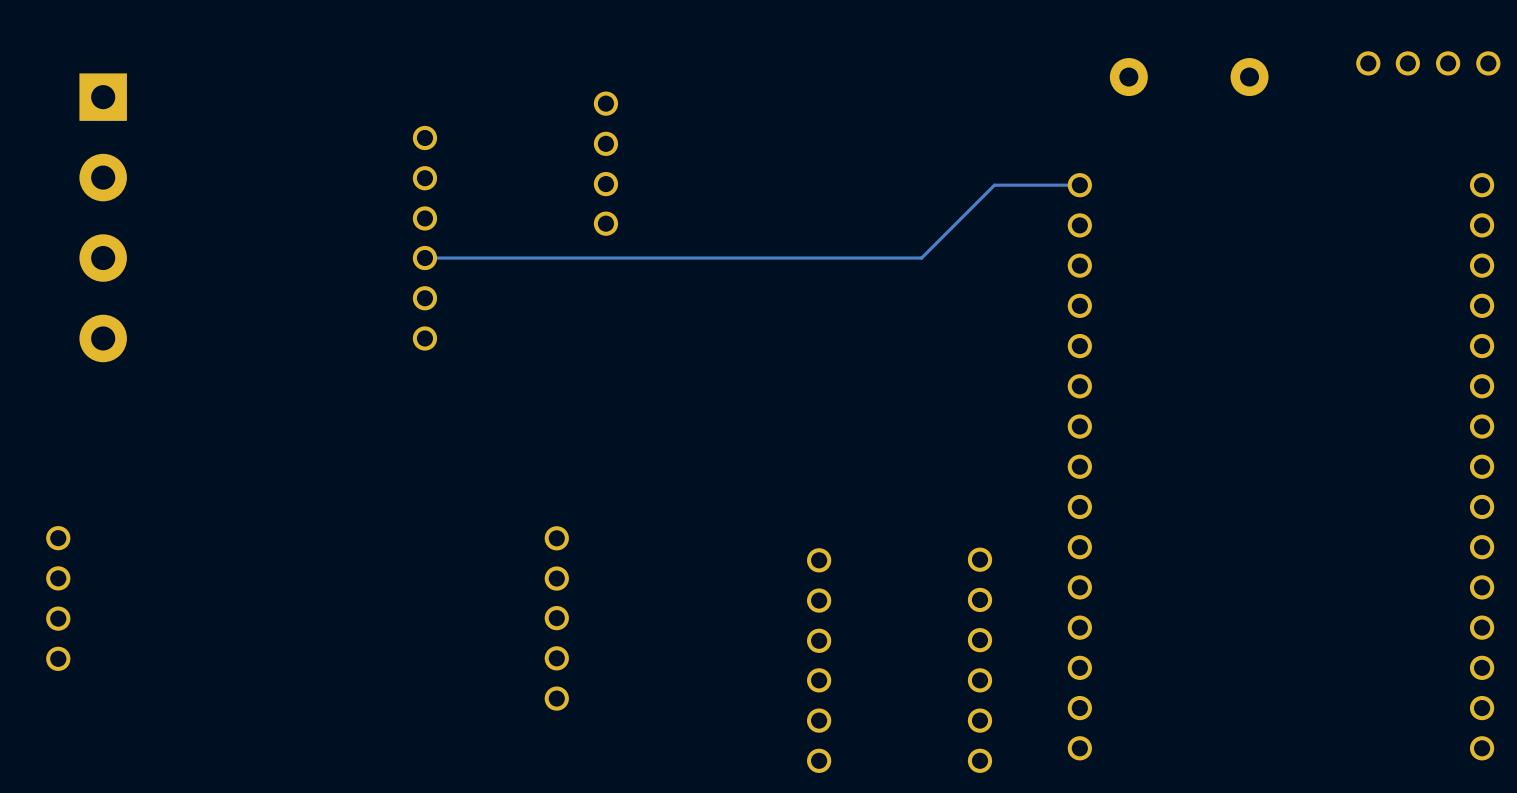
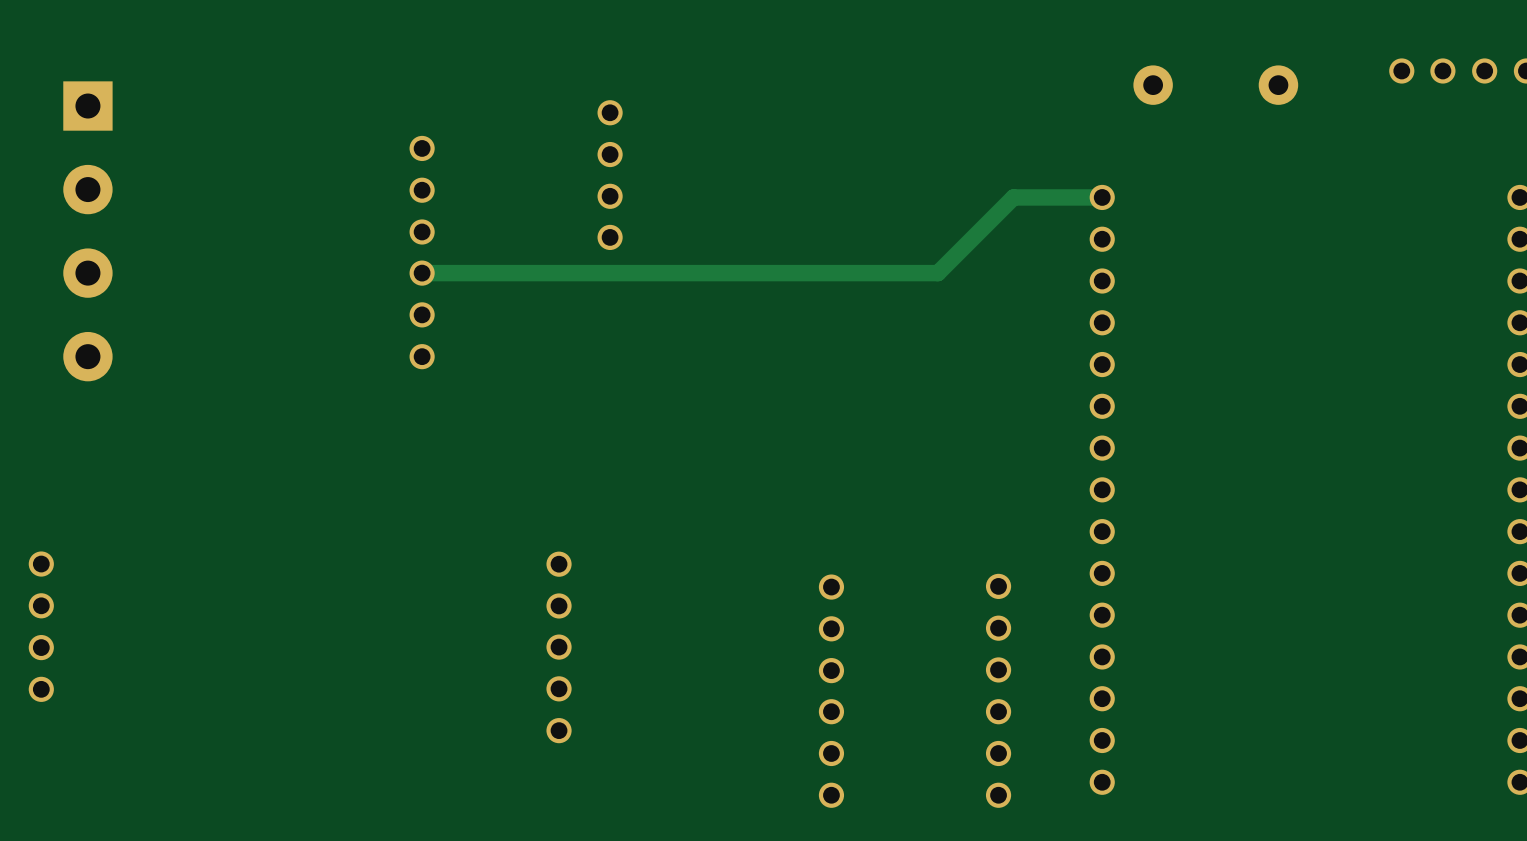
track width: thin (1079, 185) (994, 185) (921, 258) (424, 258) -> thick (1102, 197) (1013, 197) (937, 273) (422, 273)

